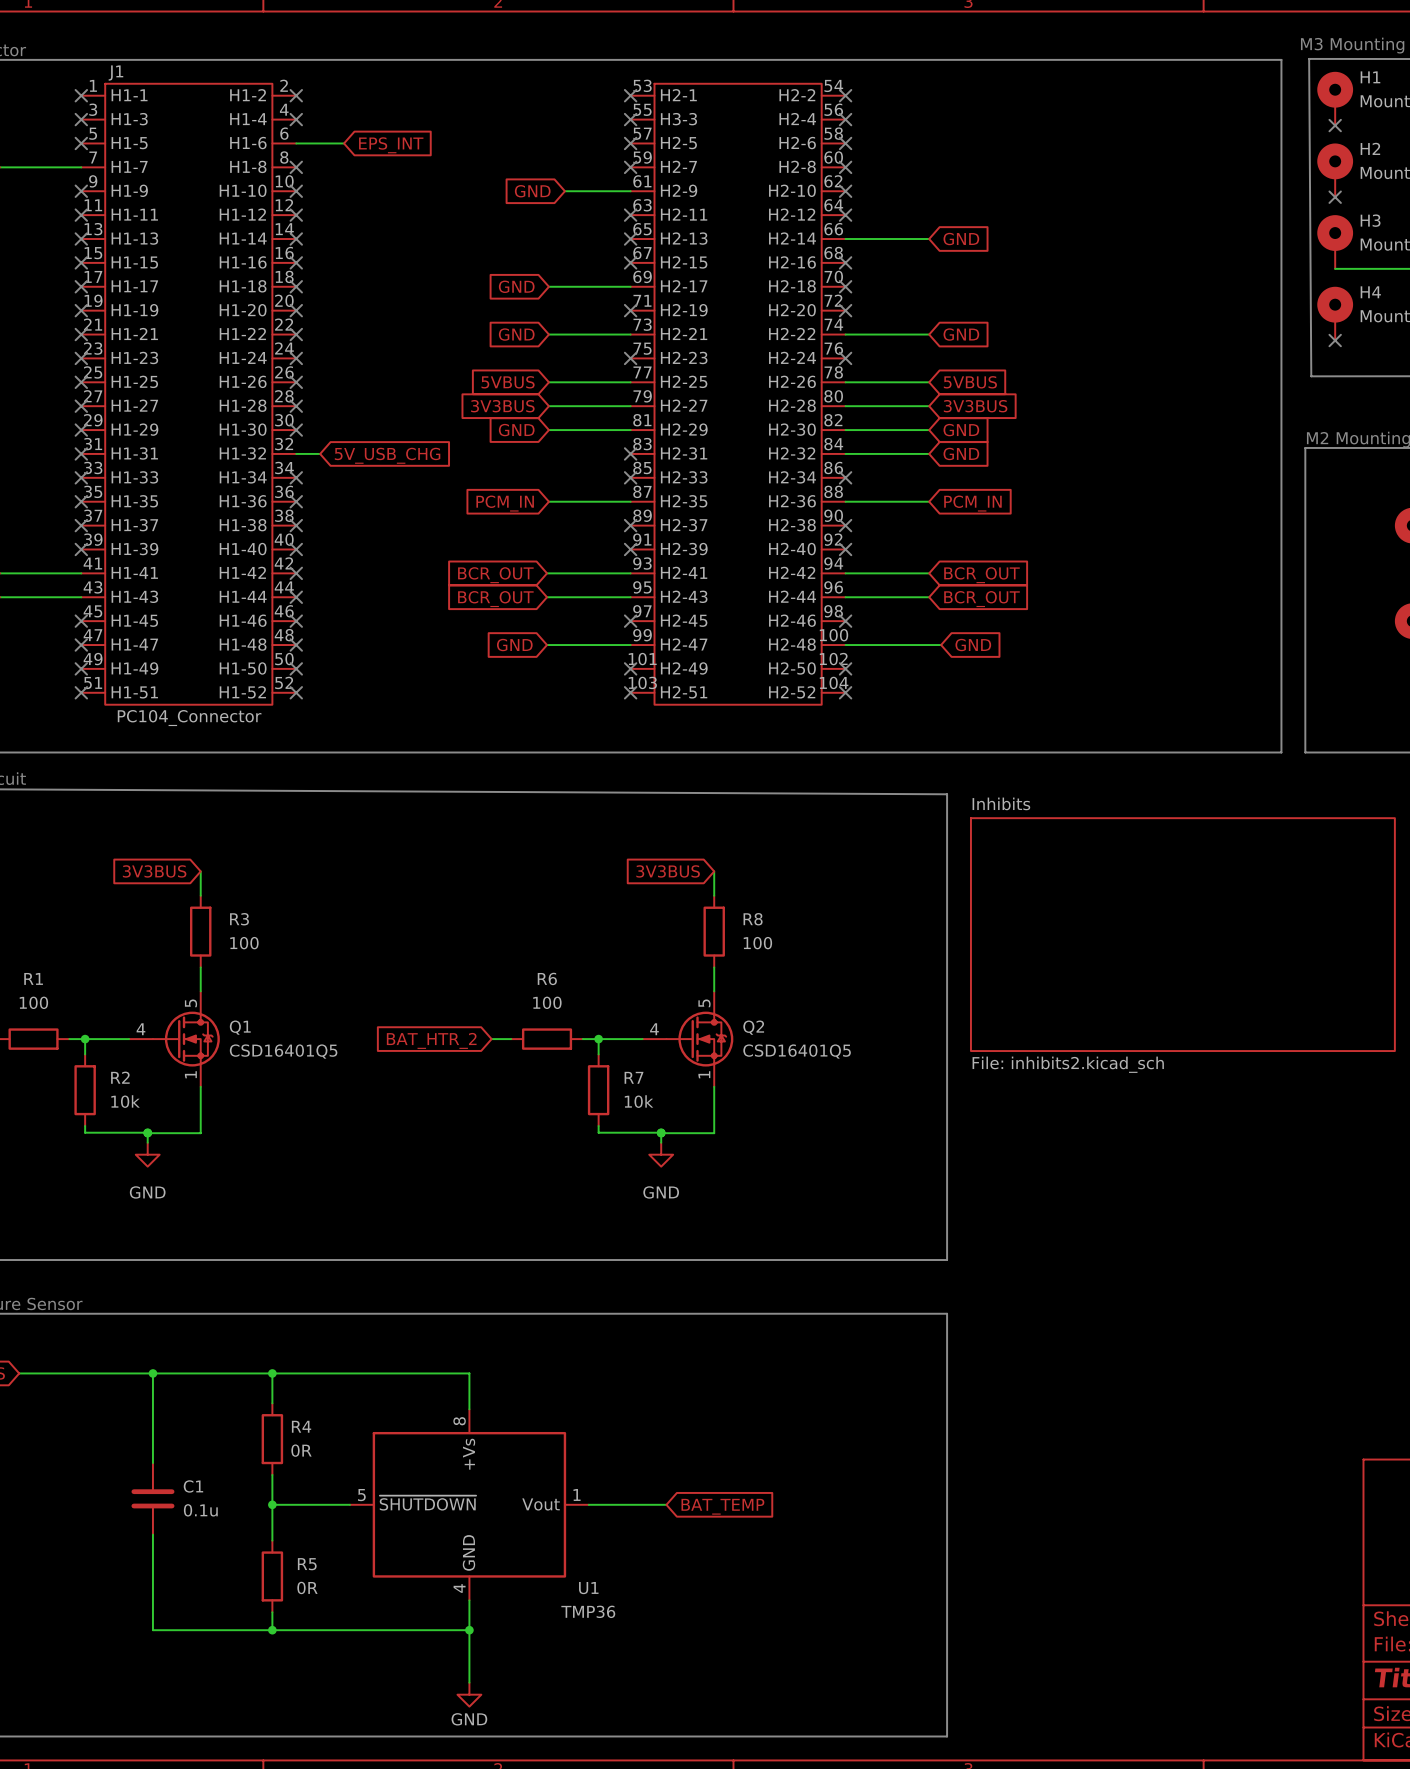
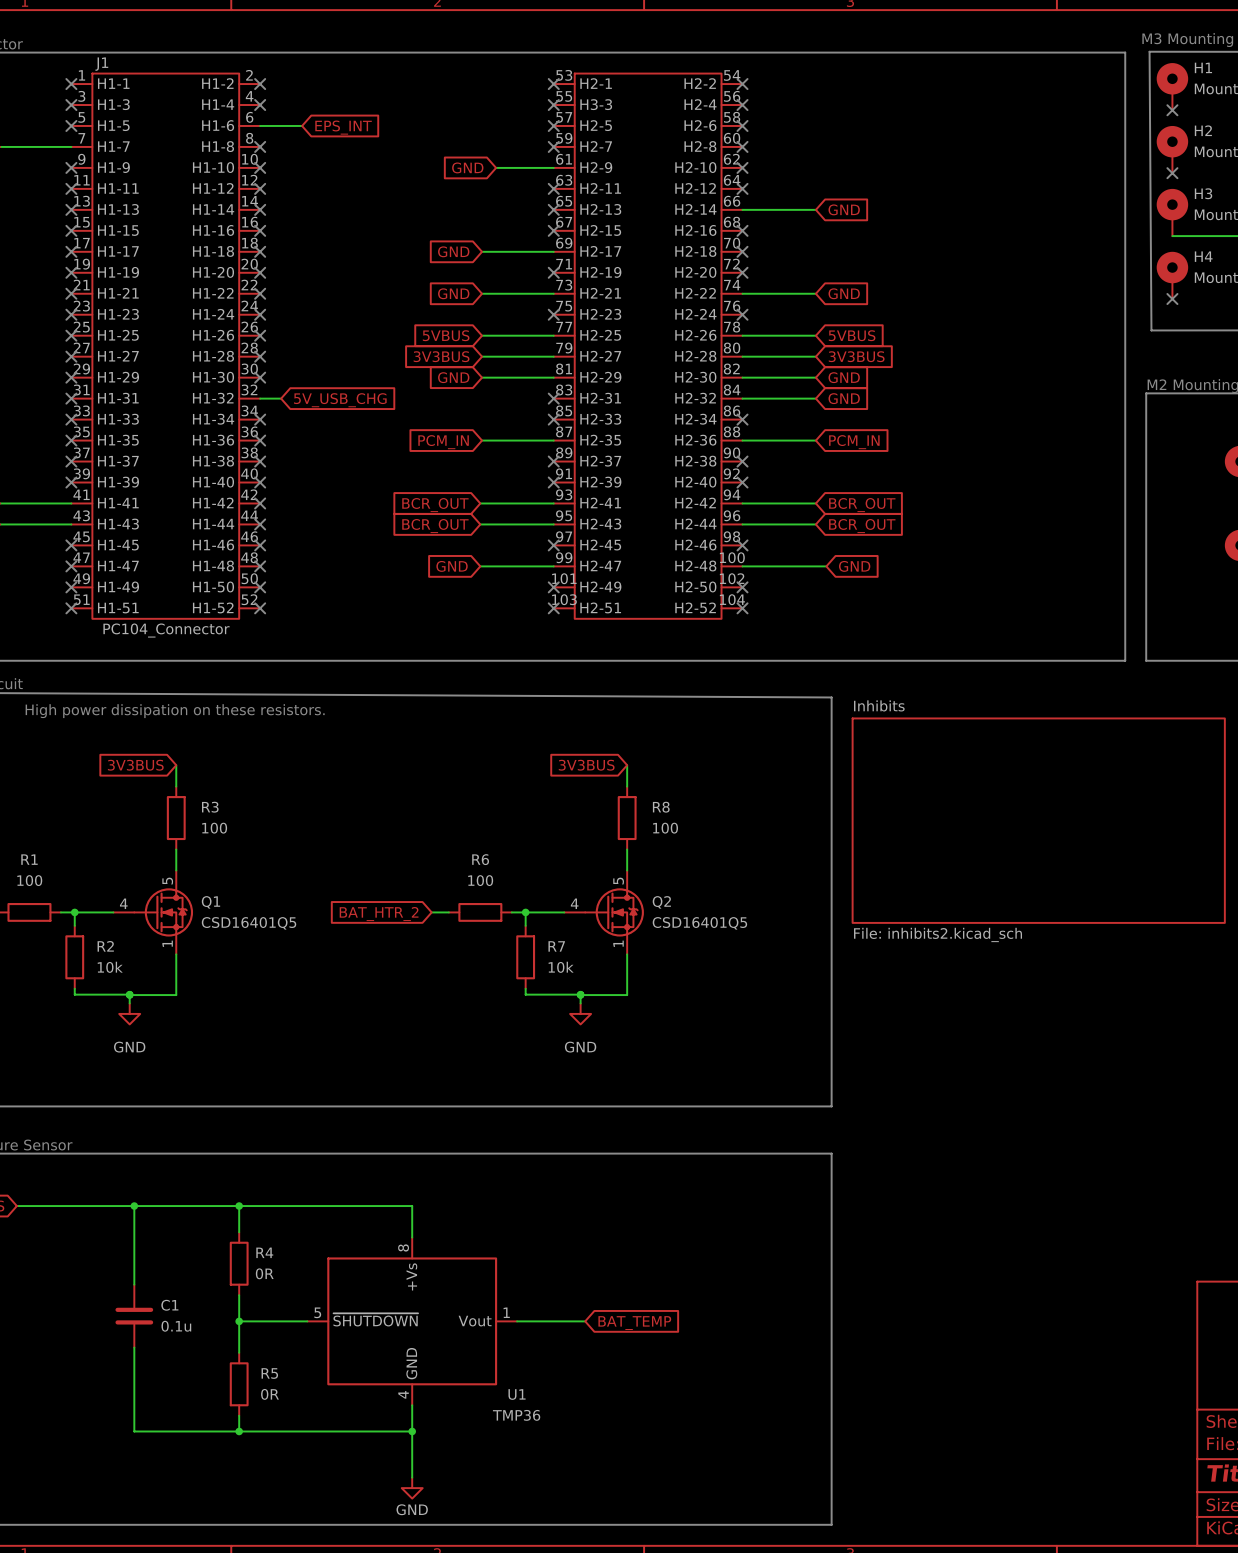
text: none -> High power dissipation on these resistors. (175, 711)

